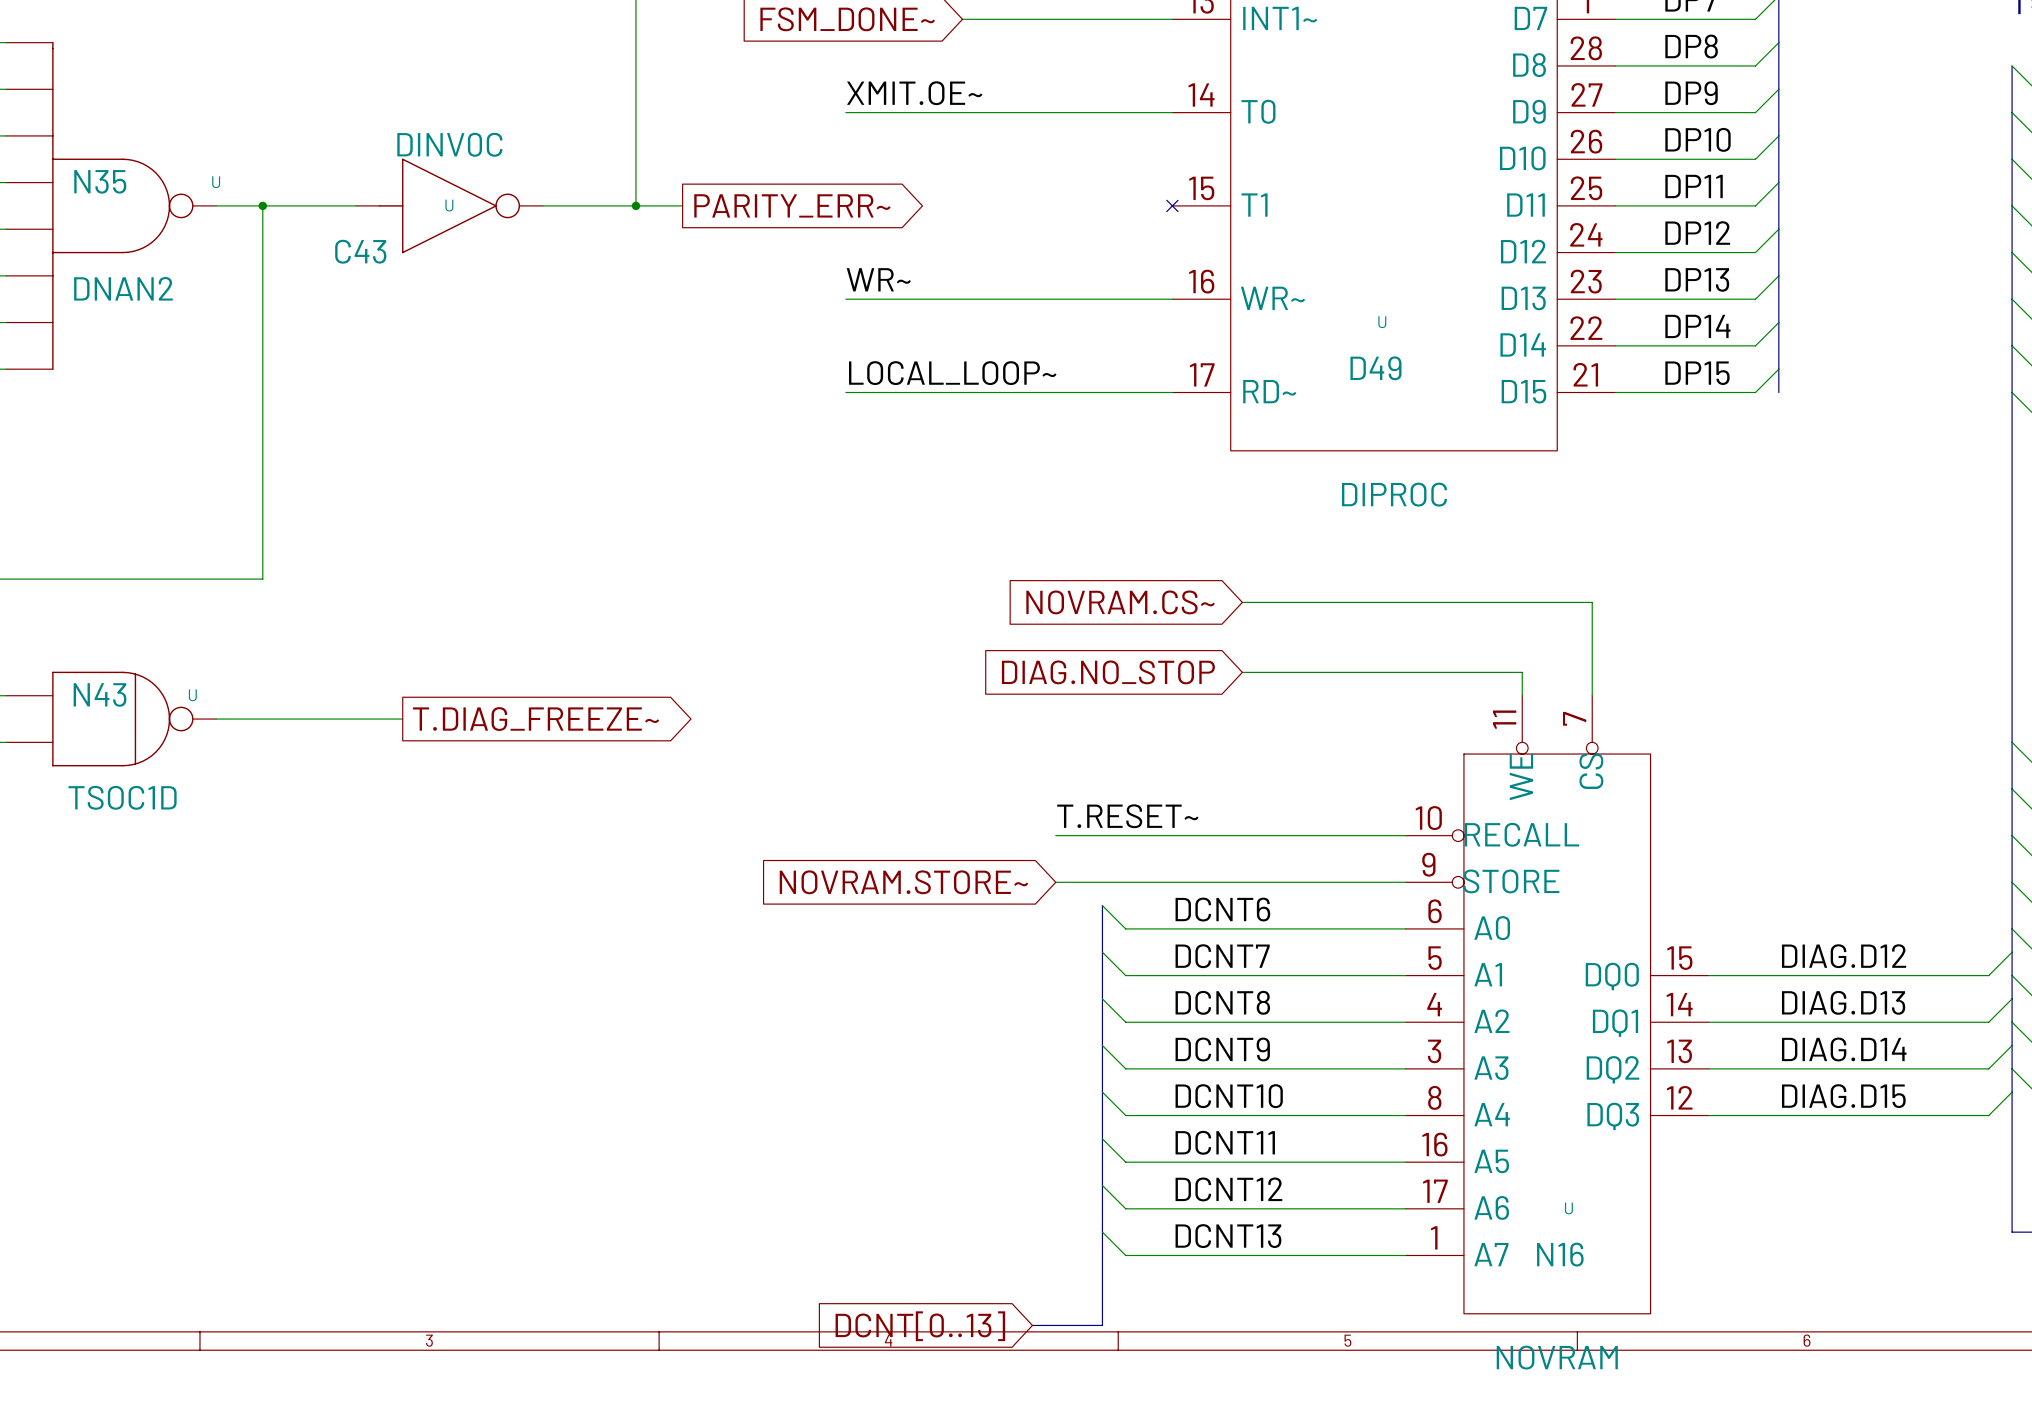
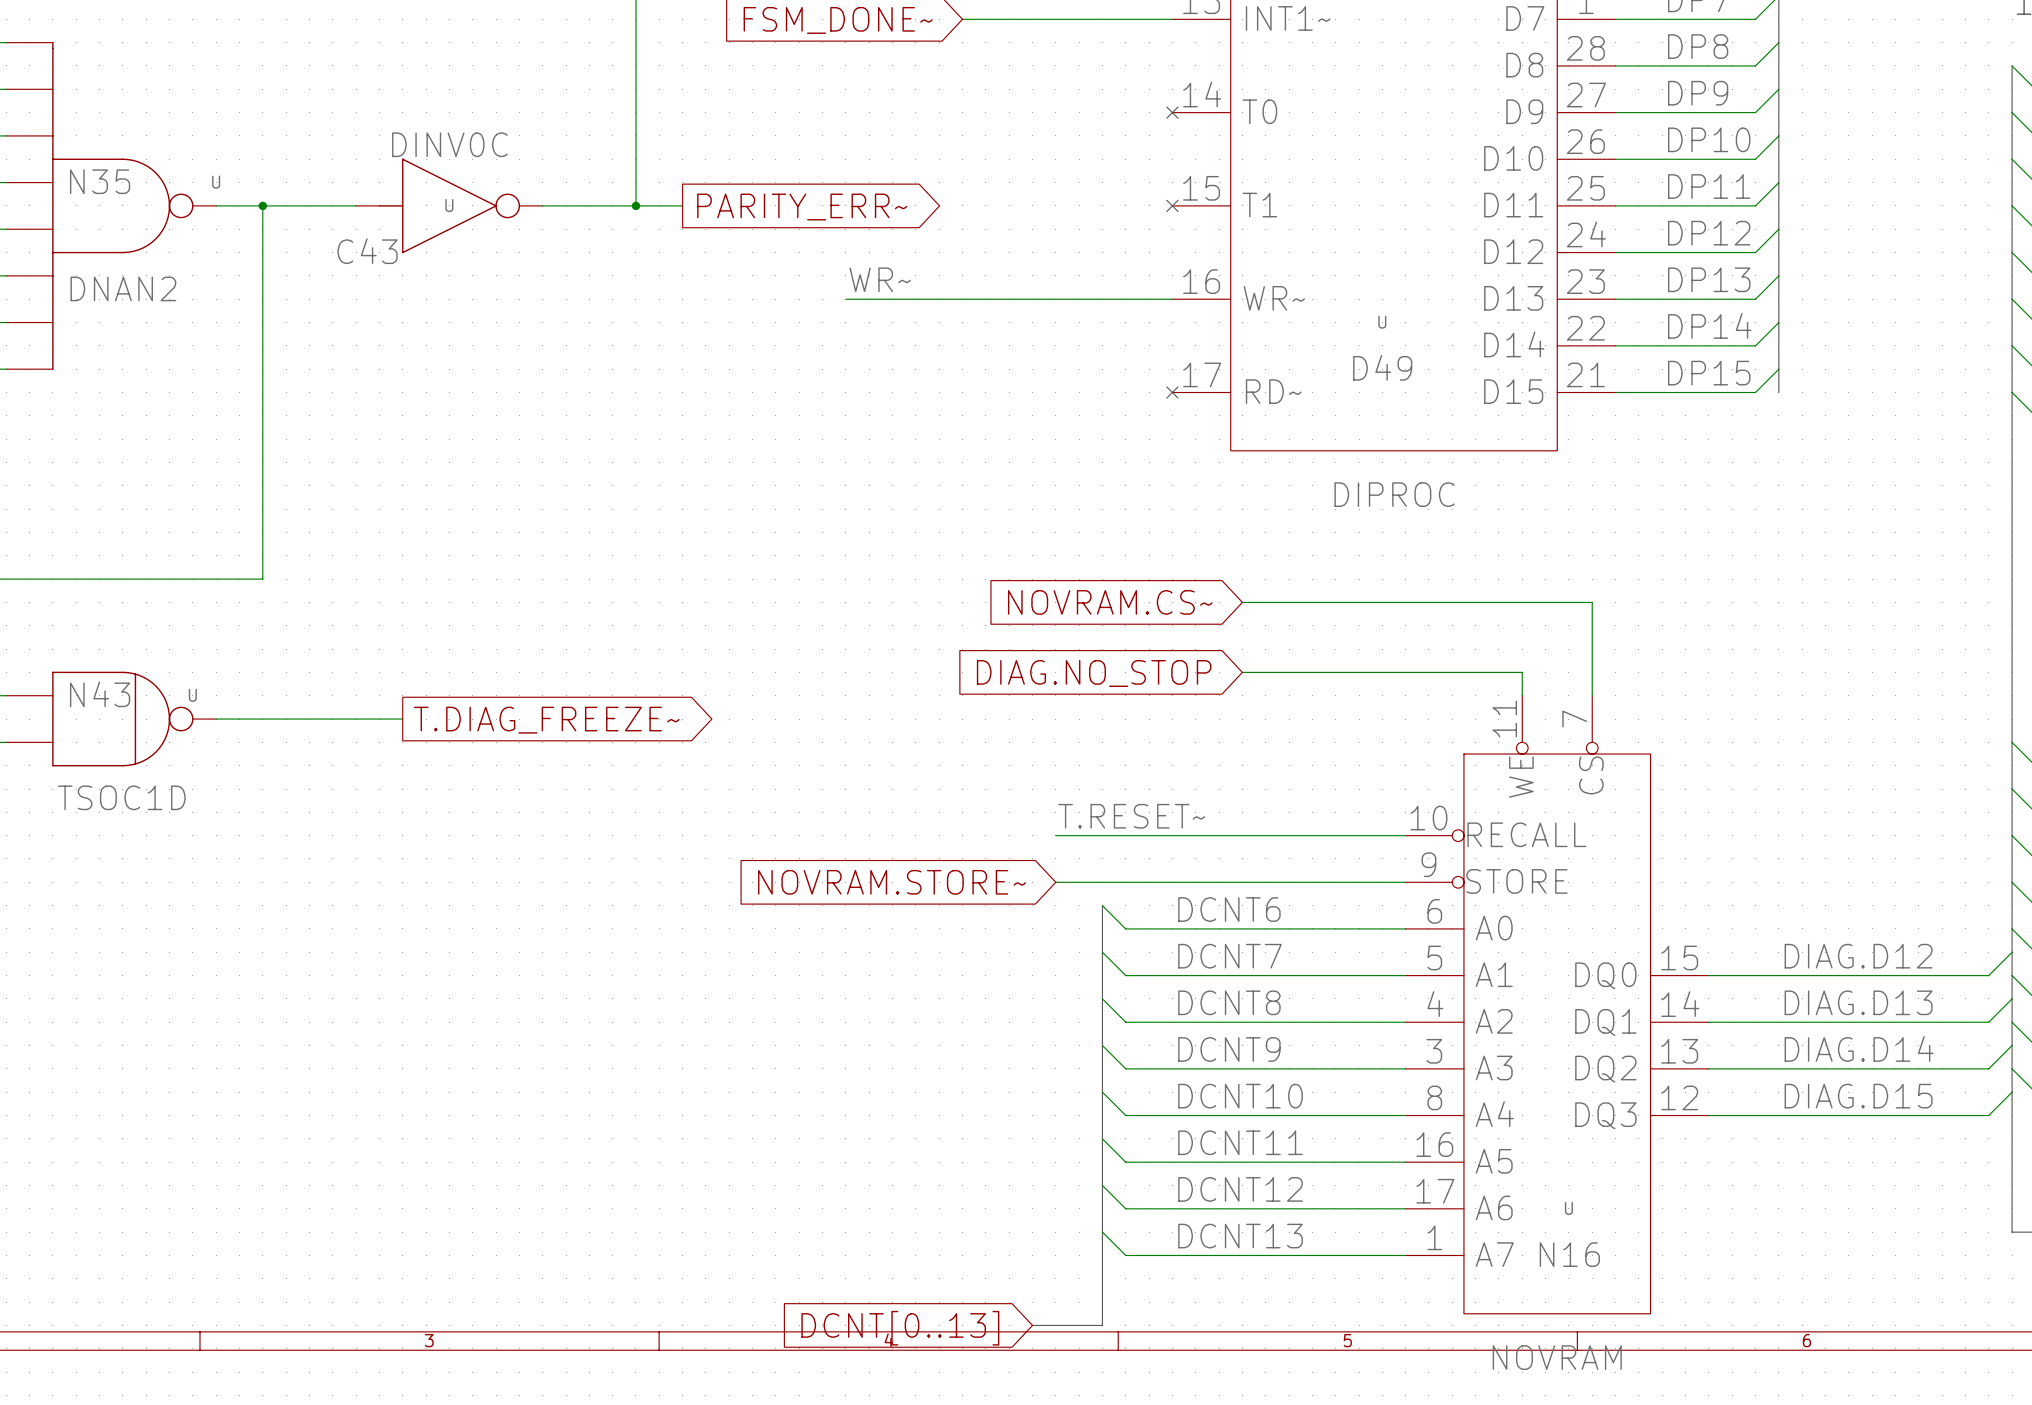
label: XMIT.OE~ (914, 93) -> none
wire: (845, 112) (1172, 112) -> none
no-connect mark: none -> (1172, 112)
label: LOCAL_LOOP~ (952, 373) -> none
wire: (845, 392) (1172, 392) -> none
no-connect mark: none -> (1172, 392)

